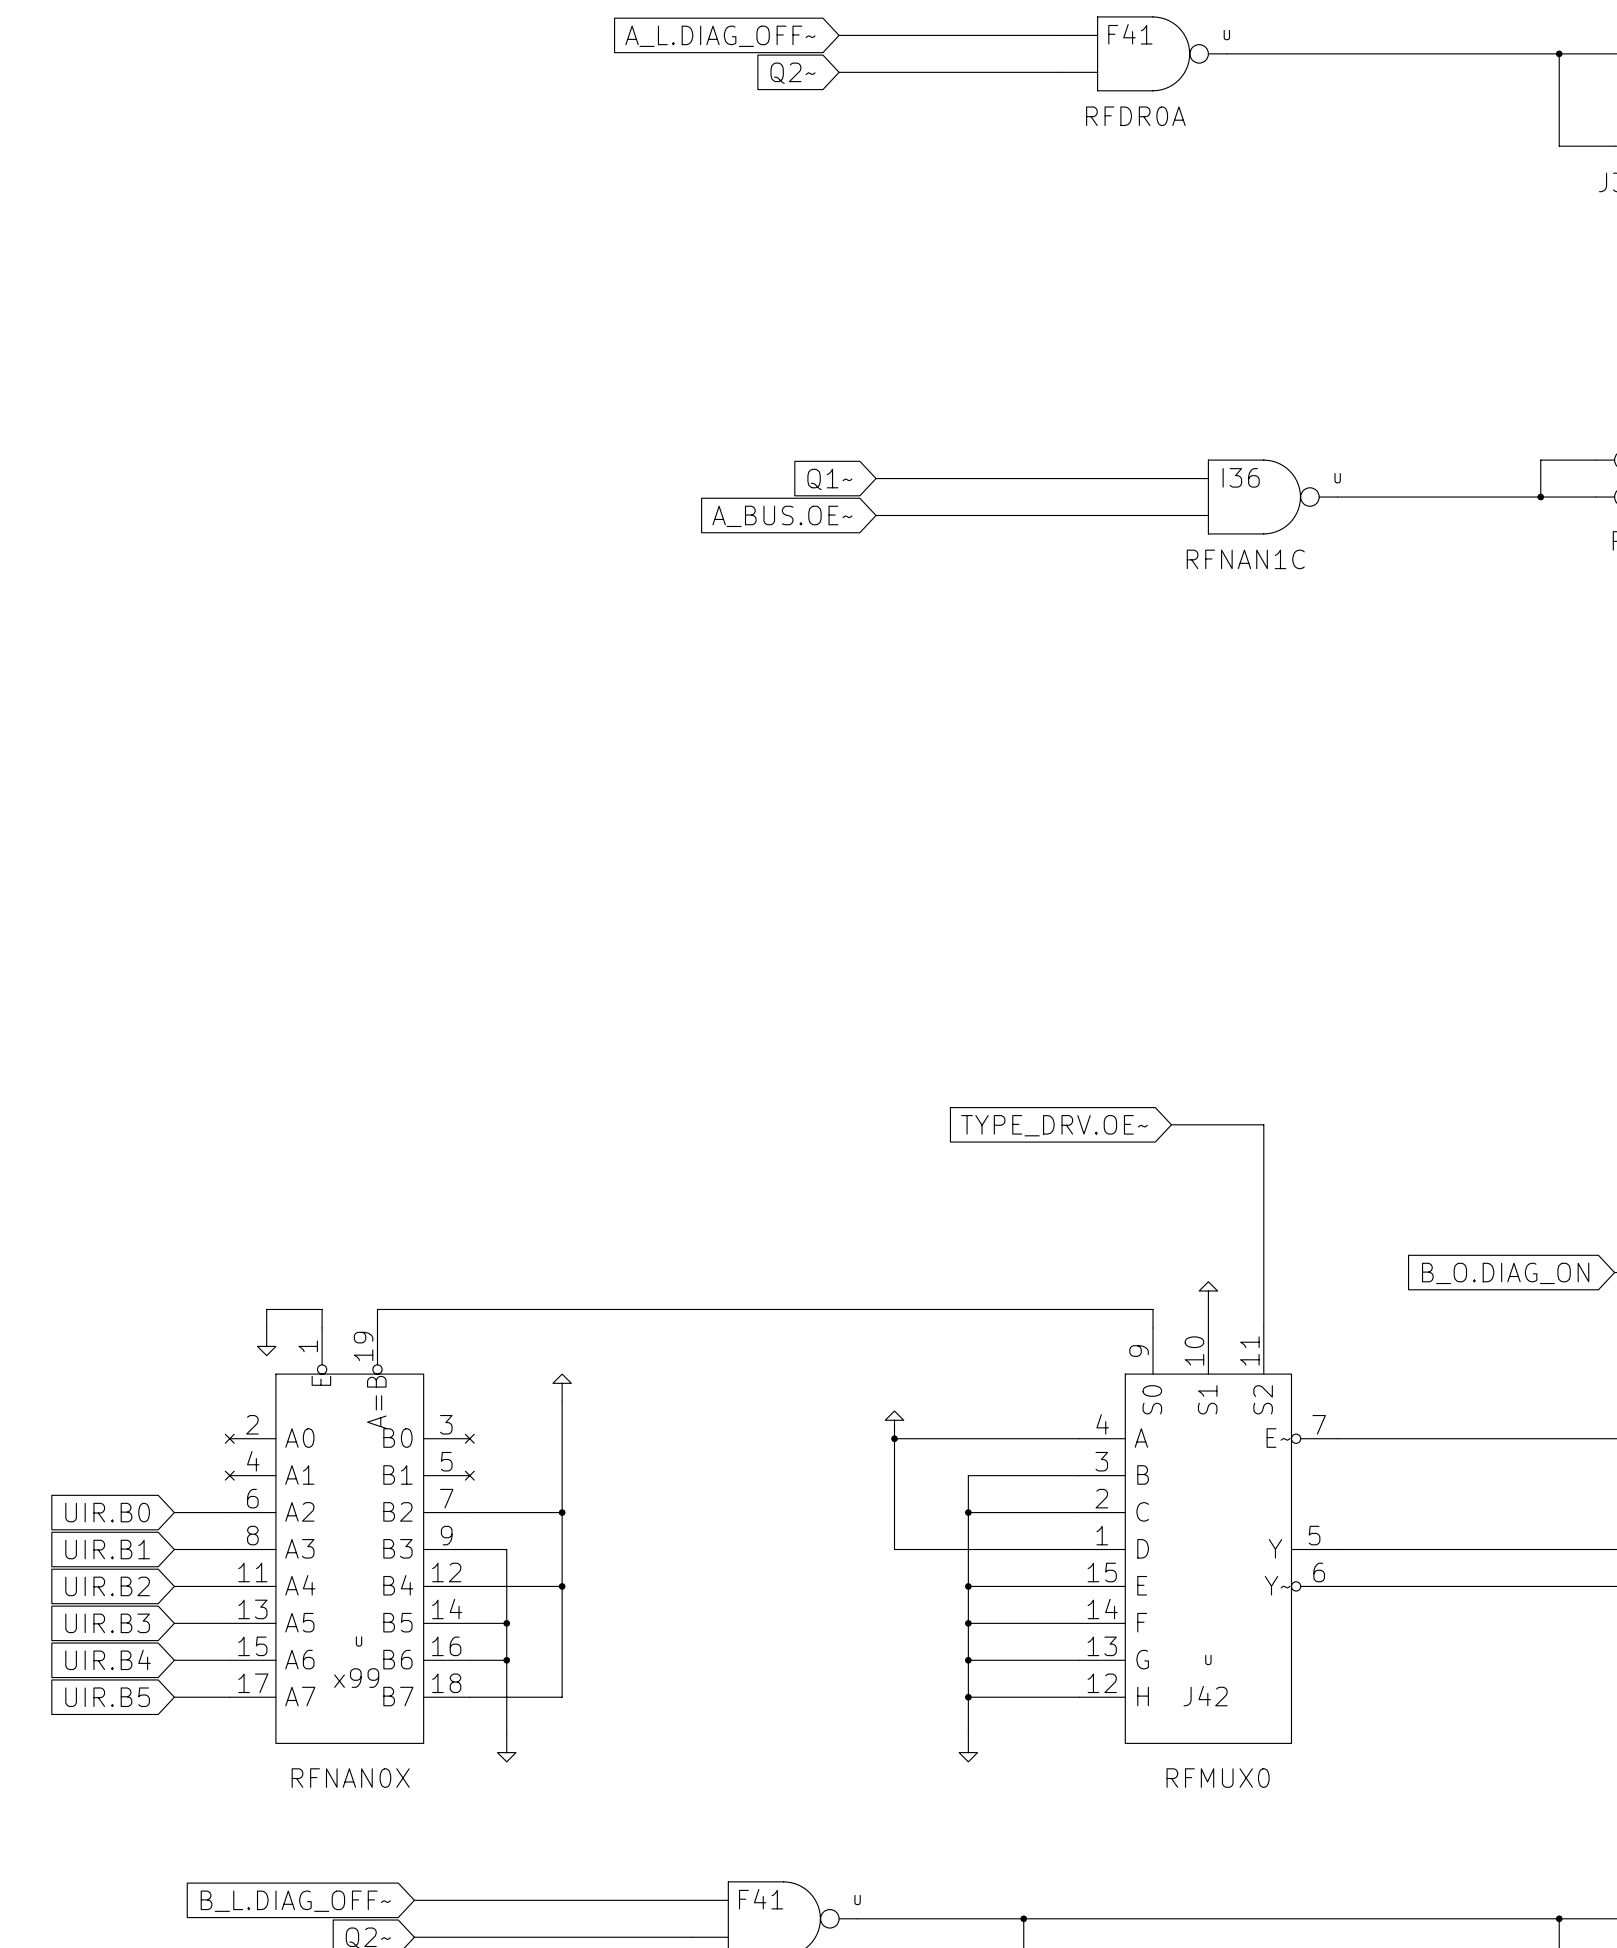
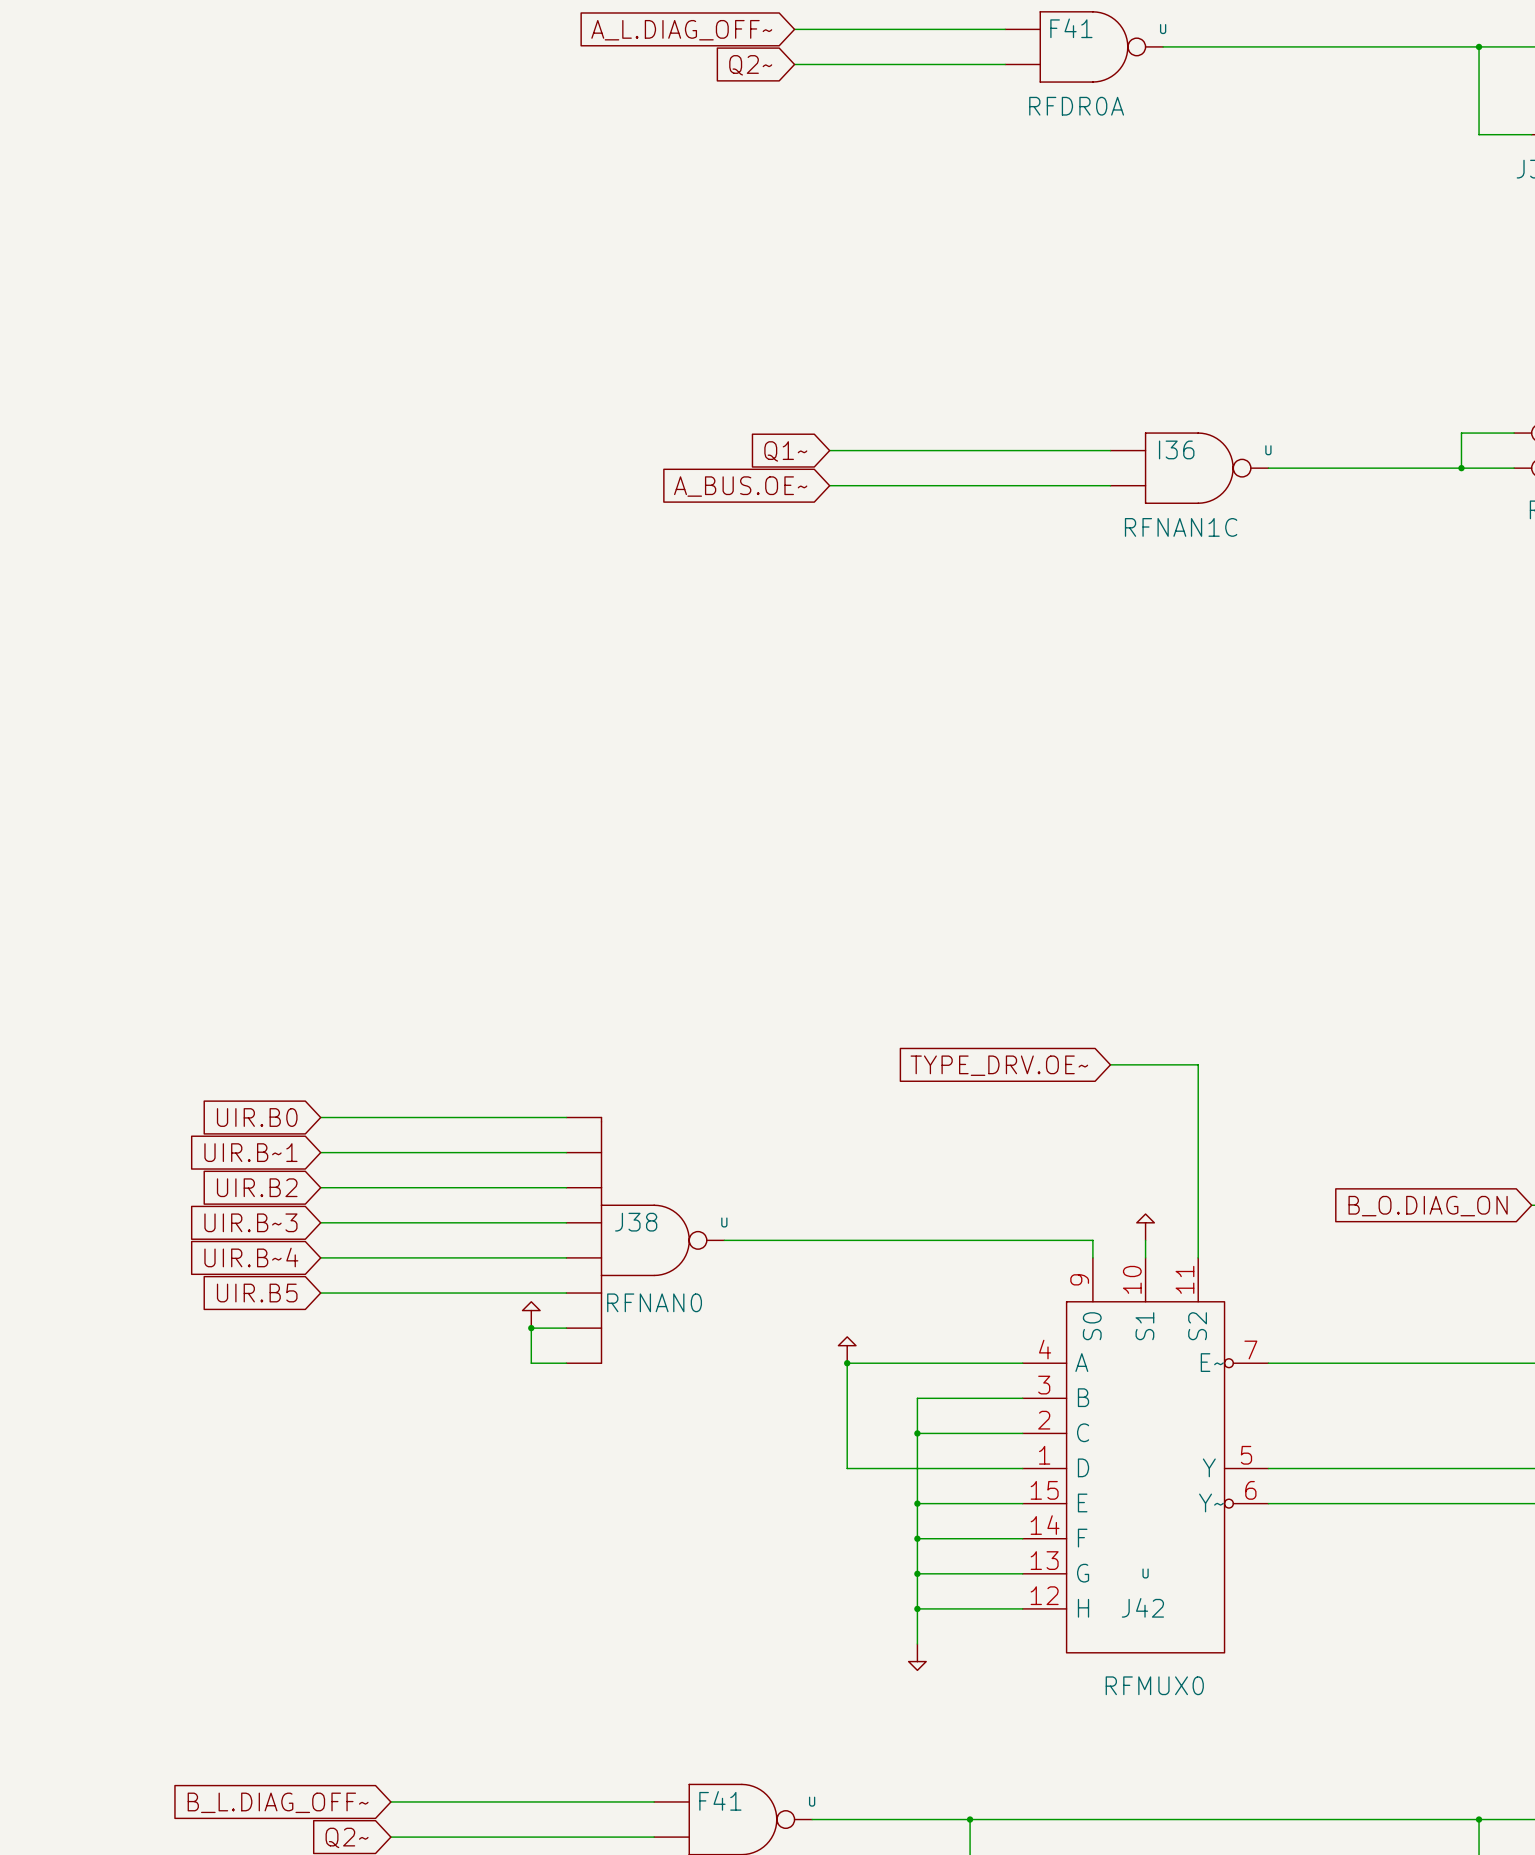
global label: none -> UIR.B0 (257, 1117)
wire: none -> (320, 1117) (566, 1117)
global label: none -> UIR.B~1 (250, 1152)
wire: none -> (320, 1152) (566, 1152)
global label: none -> UIR.B2 (257, 1187)
wire: none -> (320, 1187) (566, 1187)
global label: none -> UIR.B~3 (250, 1222)
wire: none -> (320, 1222) (566, 1222)
U: none -> (645, 1240)
wire: (765, 1309) (377, 1309) (377, 1327) -> none
wire: (266, 1327) (266, 1309) (322, 1309) (322, 1327) -> none
global label: none -> UIR.B~4 (251, 1257)
wire: none -> (320, 1257) (566, 1257)
power symbol: (266, 1342) -> none
global label: none -> UIR.B5 (257, 1293)
wire: none -> (320, 1293) (566, 1293)
wire: none -> (531, 1328) (566, 1328)
junction: none -> (531, 1328)
no-connect mark: (229, 1438) -> none
no-connect mark: (469, 1438) -> none
wire: (562, 1438) (562, 1697) (469, 1697) -> (531, 1363) (566, 1363)
no-connect mark: (229, 1475) -> none
no-connect mark: (469, 1475) -> none
global label: UIR.B0 (107, 1512) -> none
wire: (174, 1512) (229, 1512) -> none
wire: (469, 1512) (562, 1512) -> none
junction: (562, 1512) -> none
U: (349, 1535) -> none
global label: UIR.B1 (107, 1549) -> none
wire: (174, 1549) (229, 1549) -> none
wire: (469, 1549) (506, 1549) (506, 1734) -> none
global label: UIR.B2 (107, 1586) -> none
wire: (174, 1586) (229, 1586) -> none
wire: (469, 1586) (562, 1586) -> none
junction: (562, 1586) -> none
global label: UIR.B3 (107, 1623) -> none
wire: (174, 1623) (229, 1623) -> none
wire: (469, 1623) (506, 1623) -> none
junction: (506, 1623) -> none
global label: UIR.B4 (108, 1659) -> none
wire: (174, 1660) (229, 1660) -> none
wire: (469, 1660) (506, 1660) -> none
junction: (506, 1660) -> none
global label: UIR.B5 (107, 1697) -> none
wire: (174, 1697) (229, 1697) -> none
power symbol: (506, 1748) -> none

